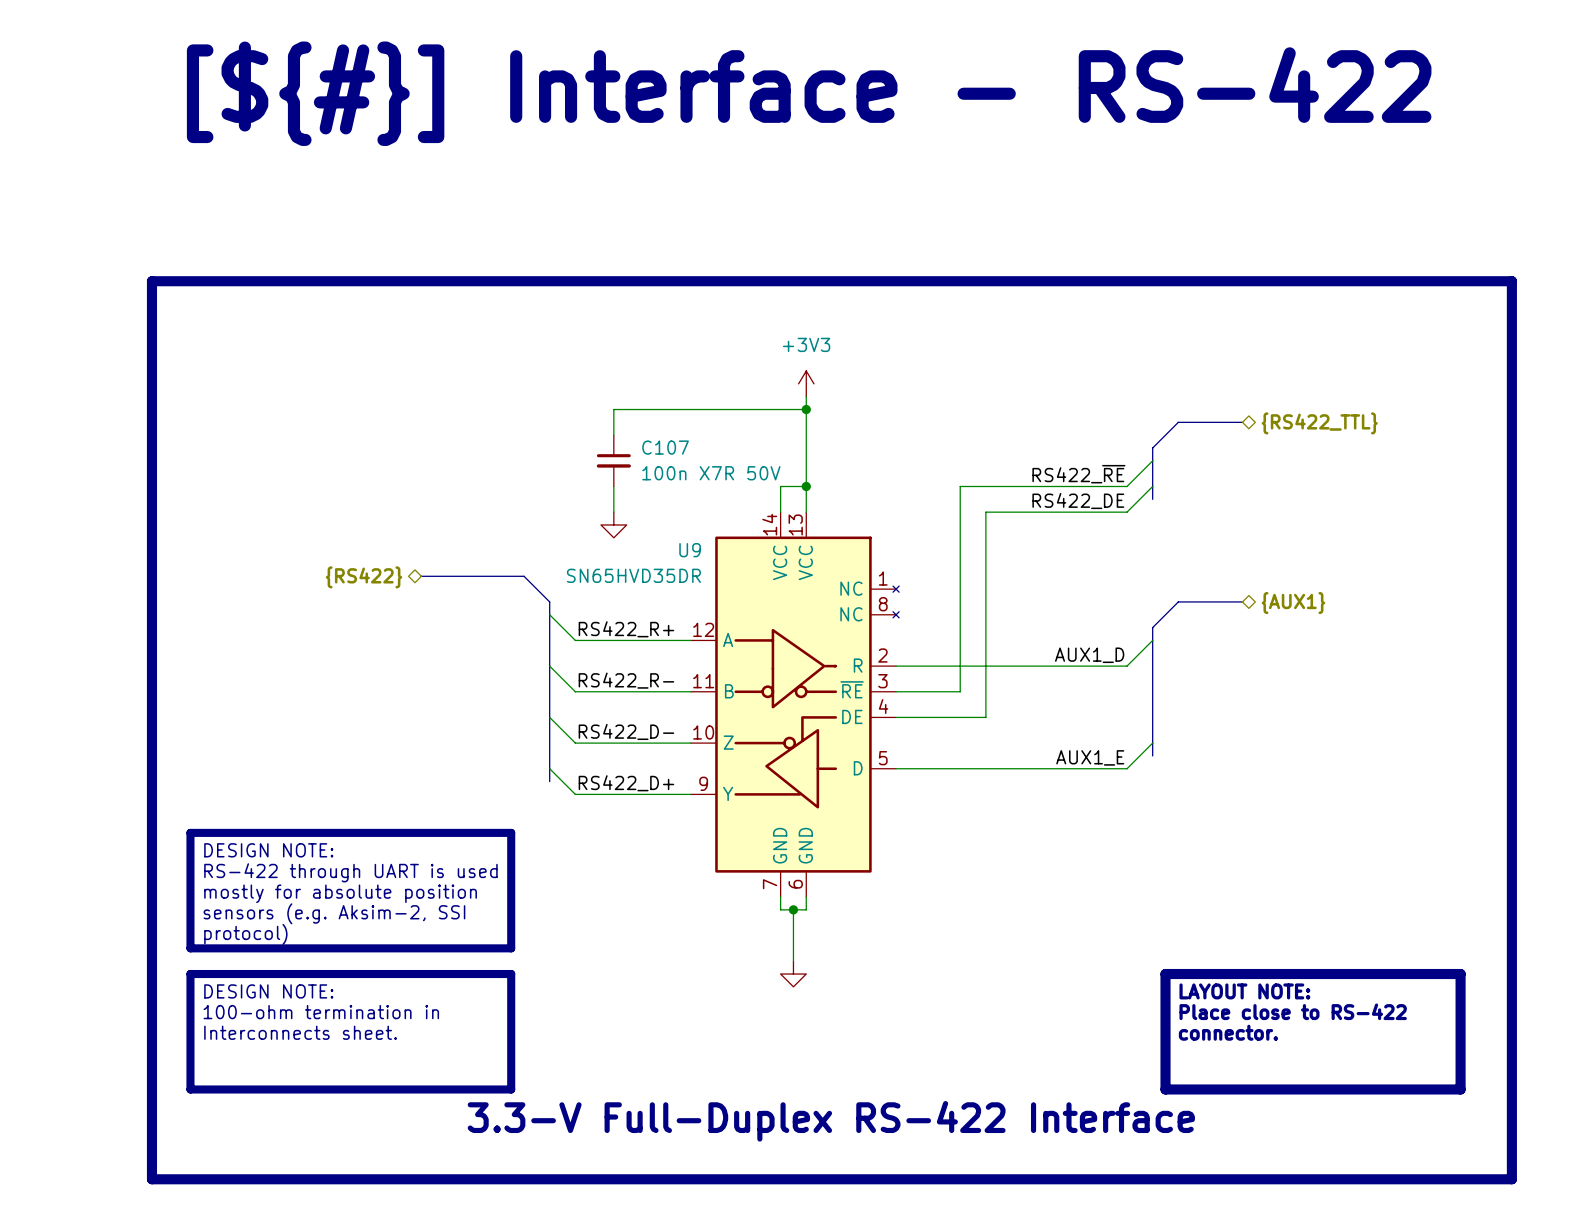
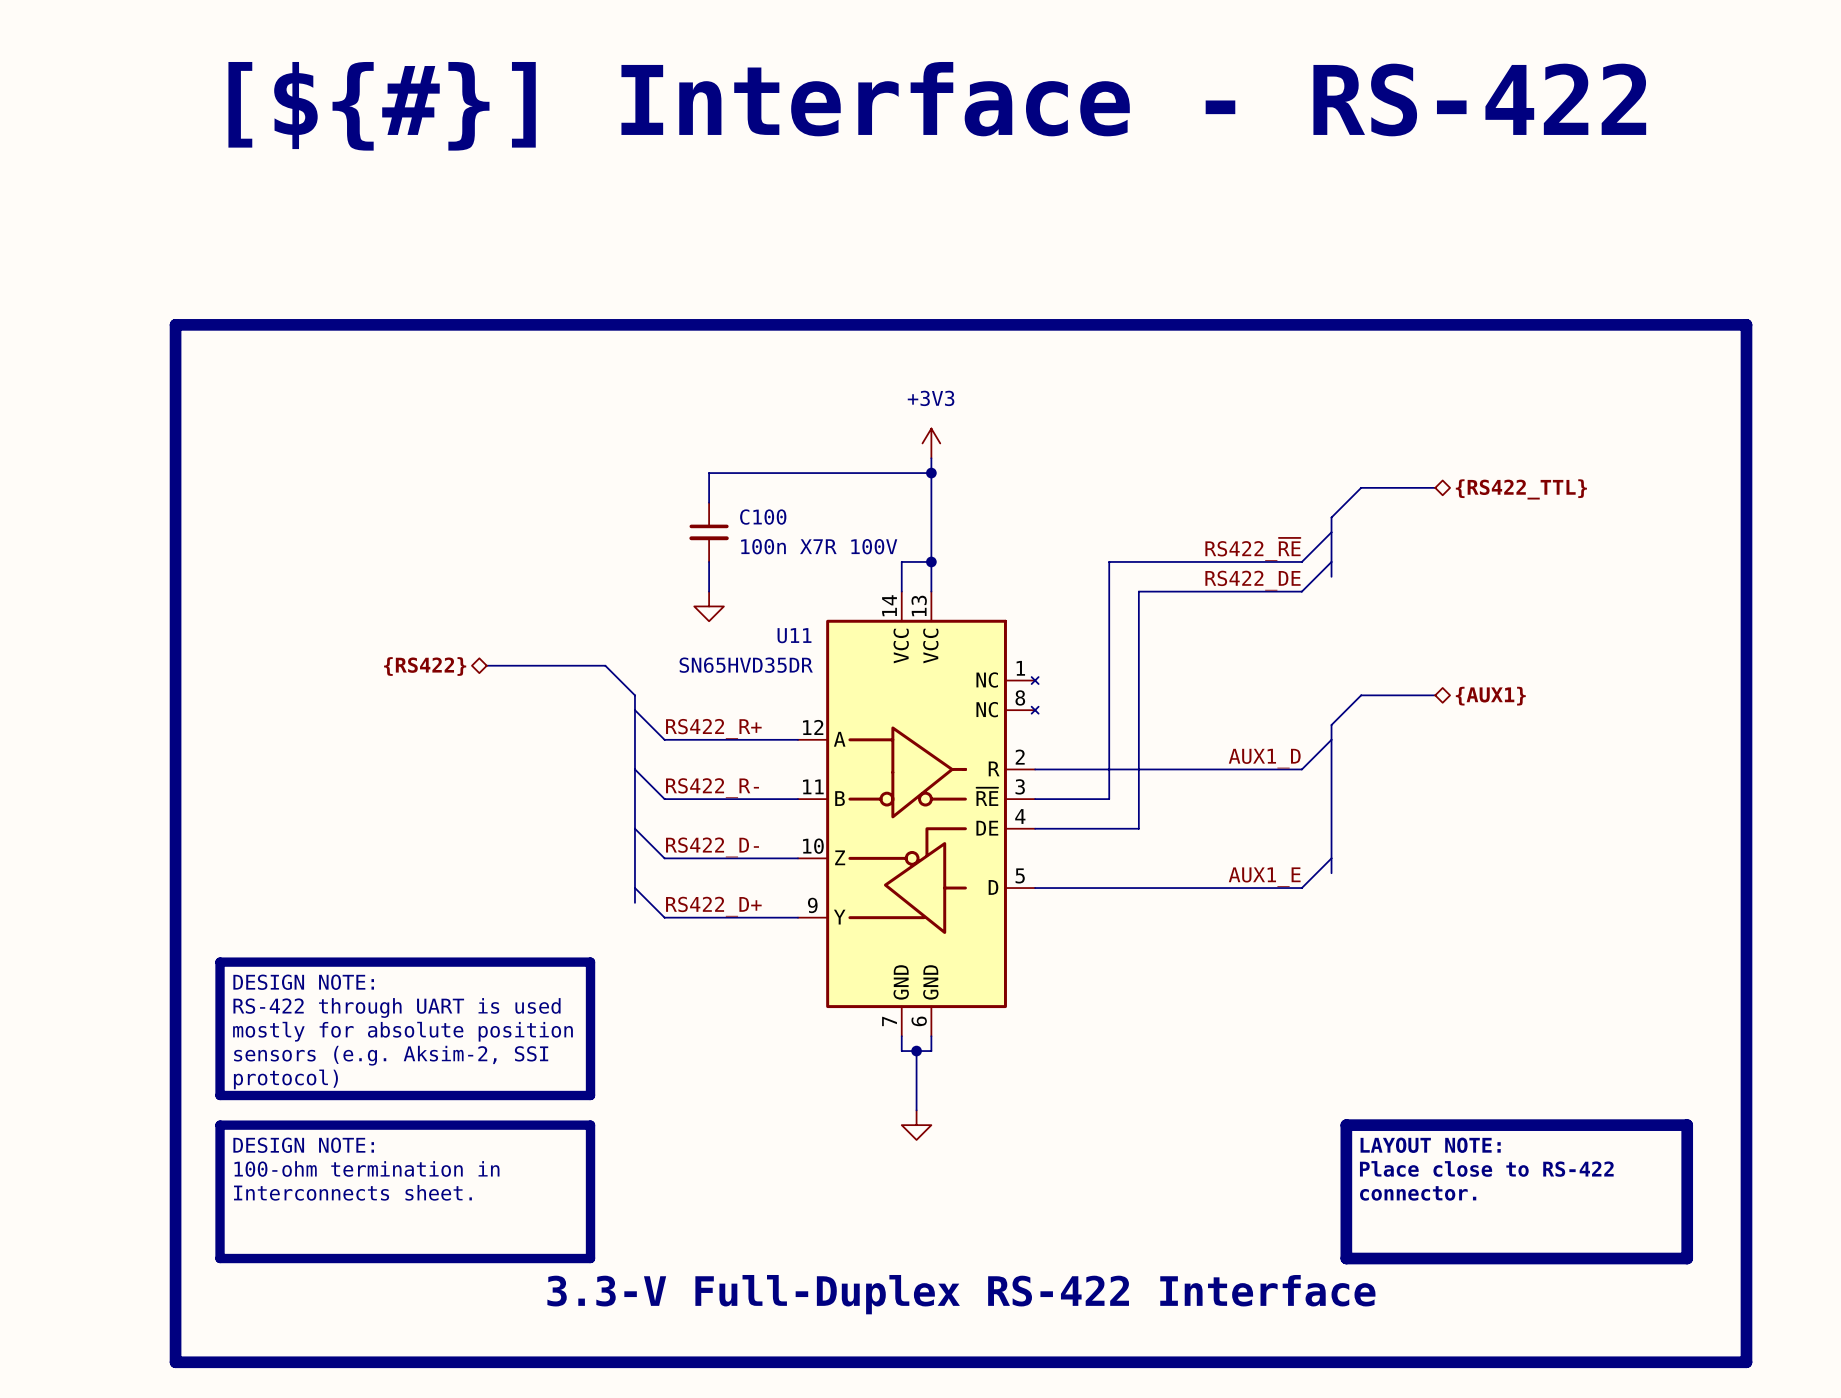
C107 name: C107 (665, 447) -> C100 (763, 517)
C107 value: 100n X7R 50V (711, 473) -> 100n X7R 100V (819, 546)
U9 name: U9 (690, 550) -> U11 (794, 635)

